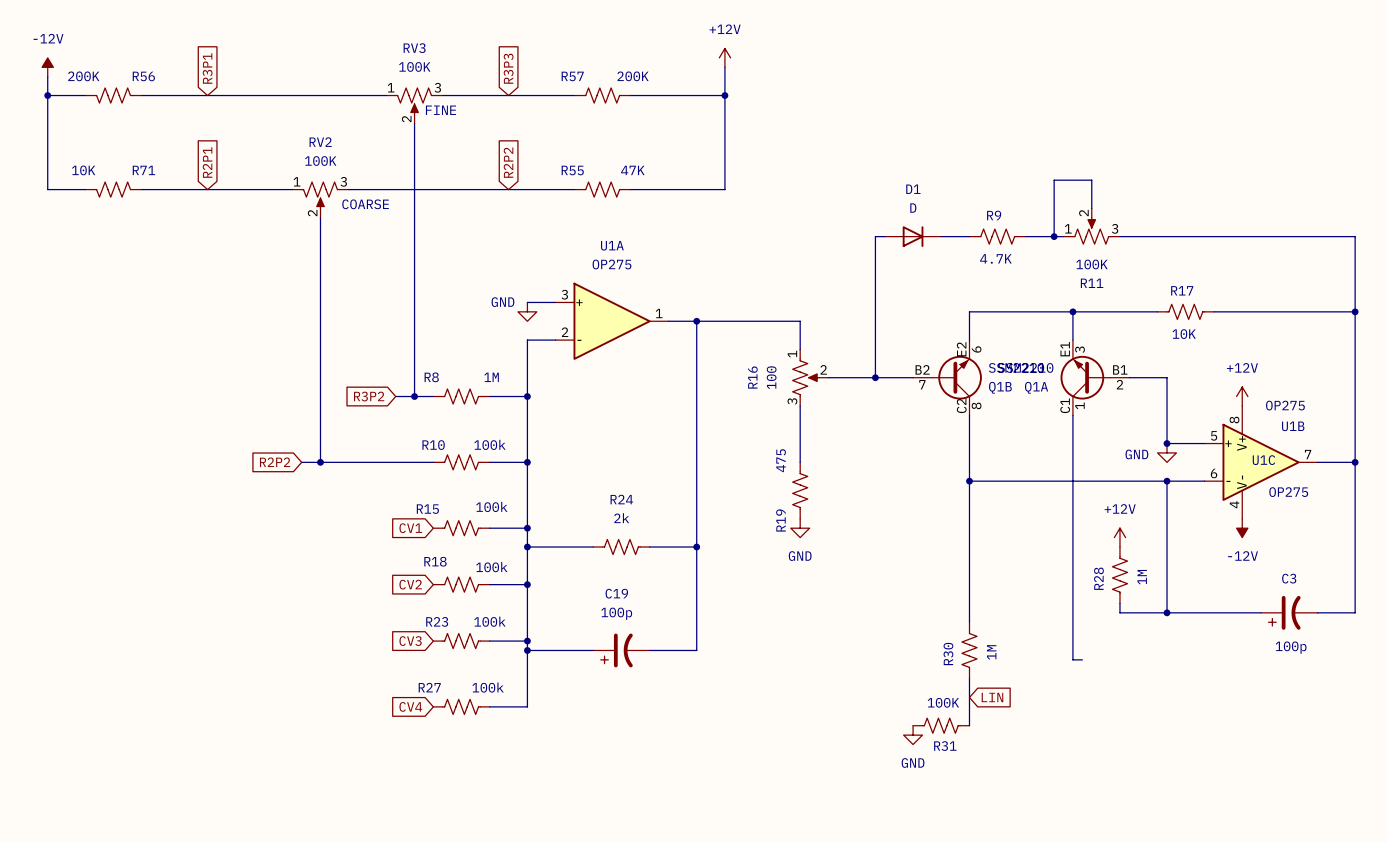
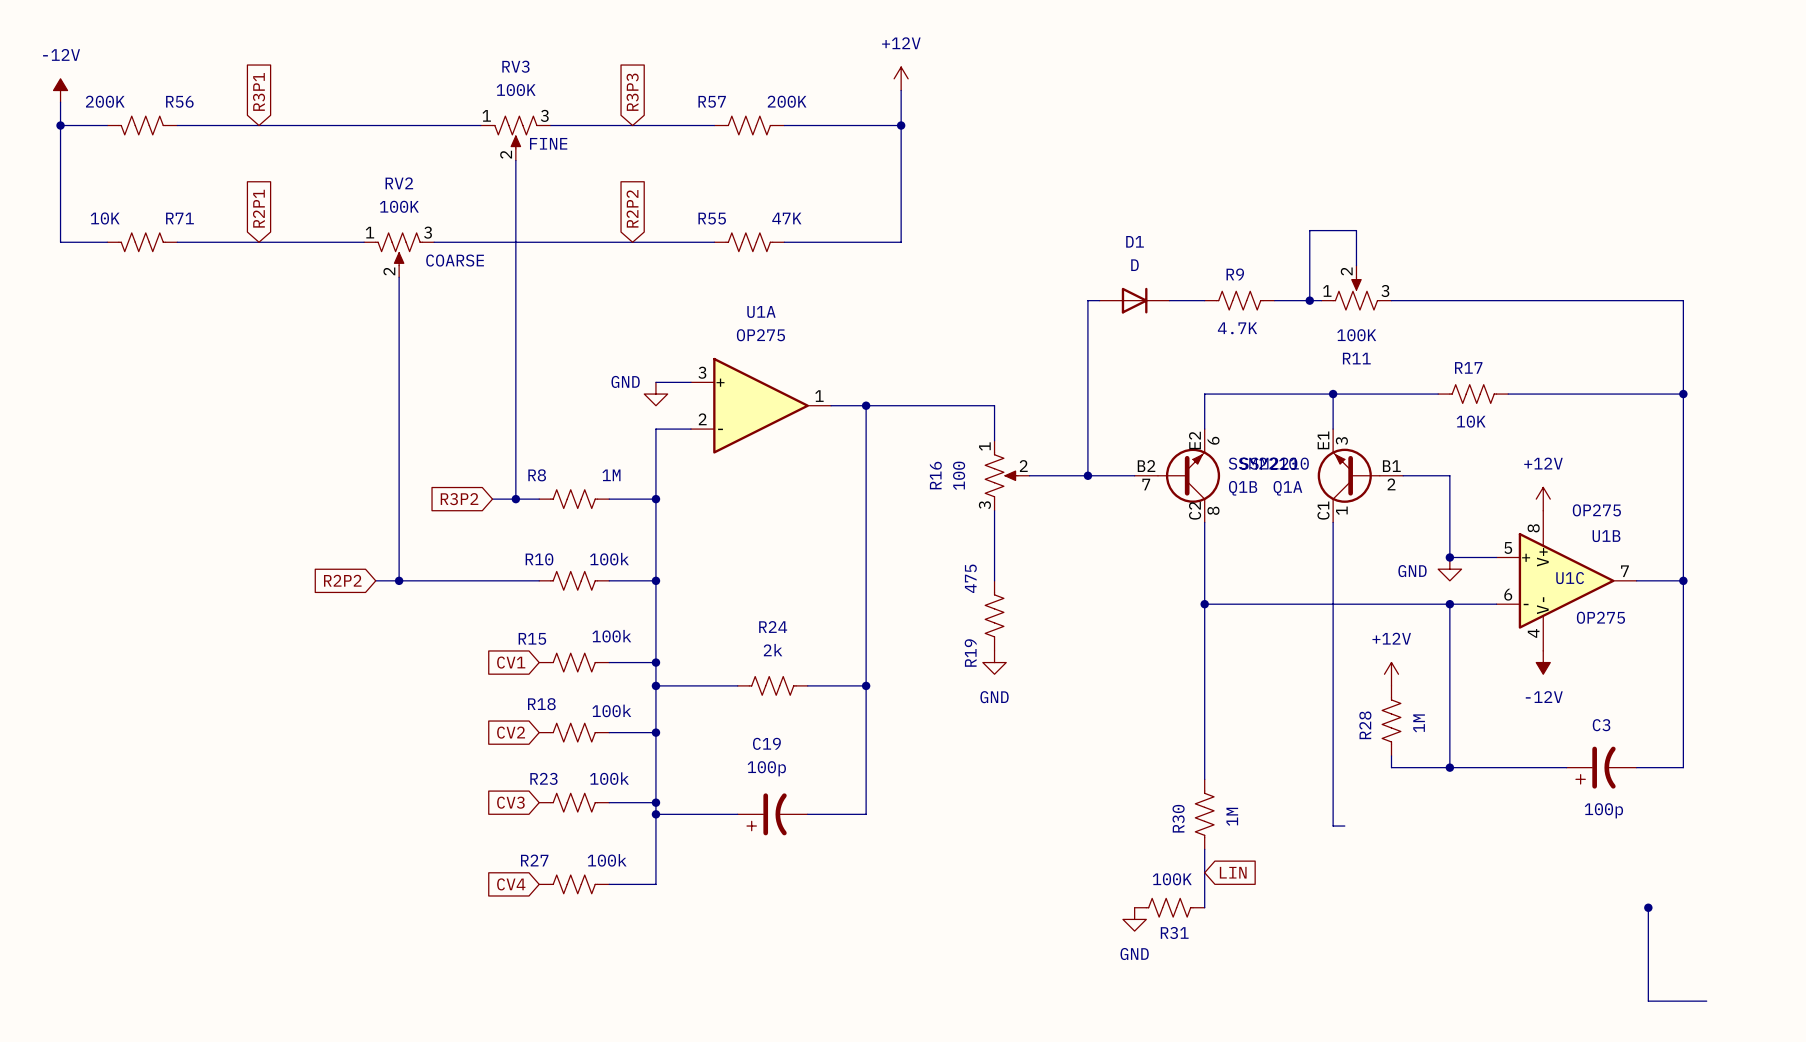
wire: none -> (1648, 907) (1648, 1001) (1706, 1001)
junction: none -> (1648, 907)

